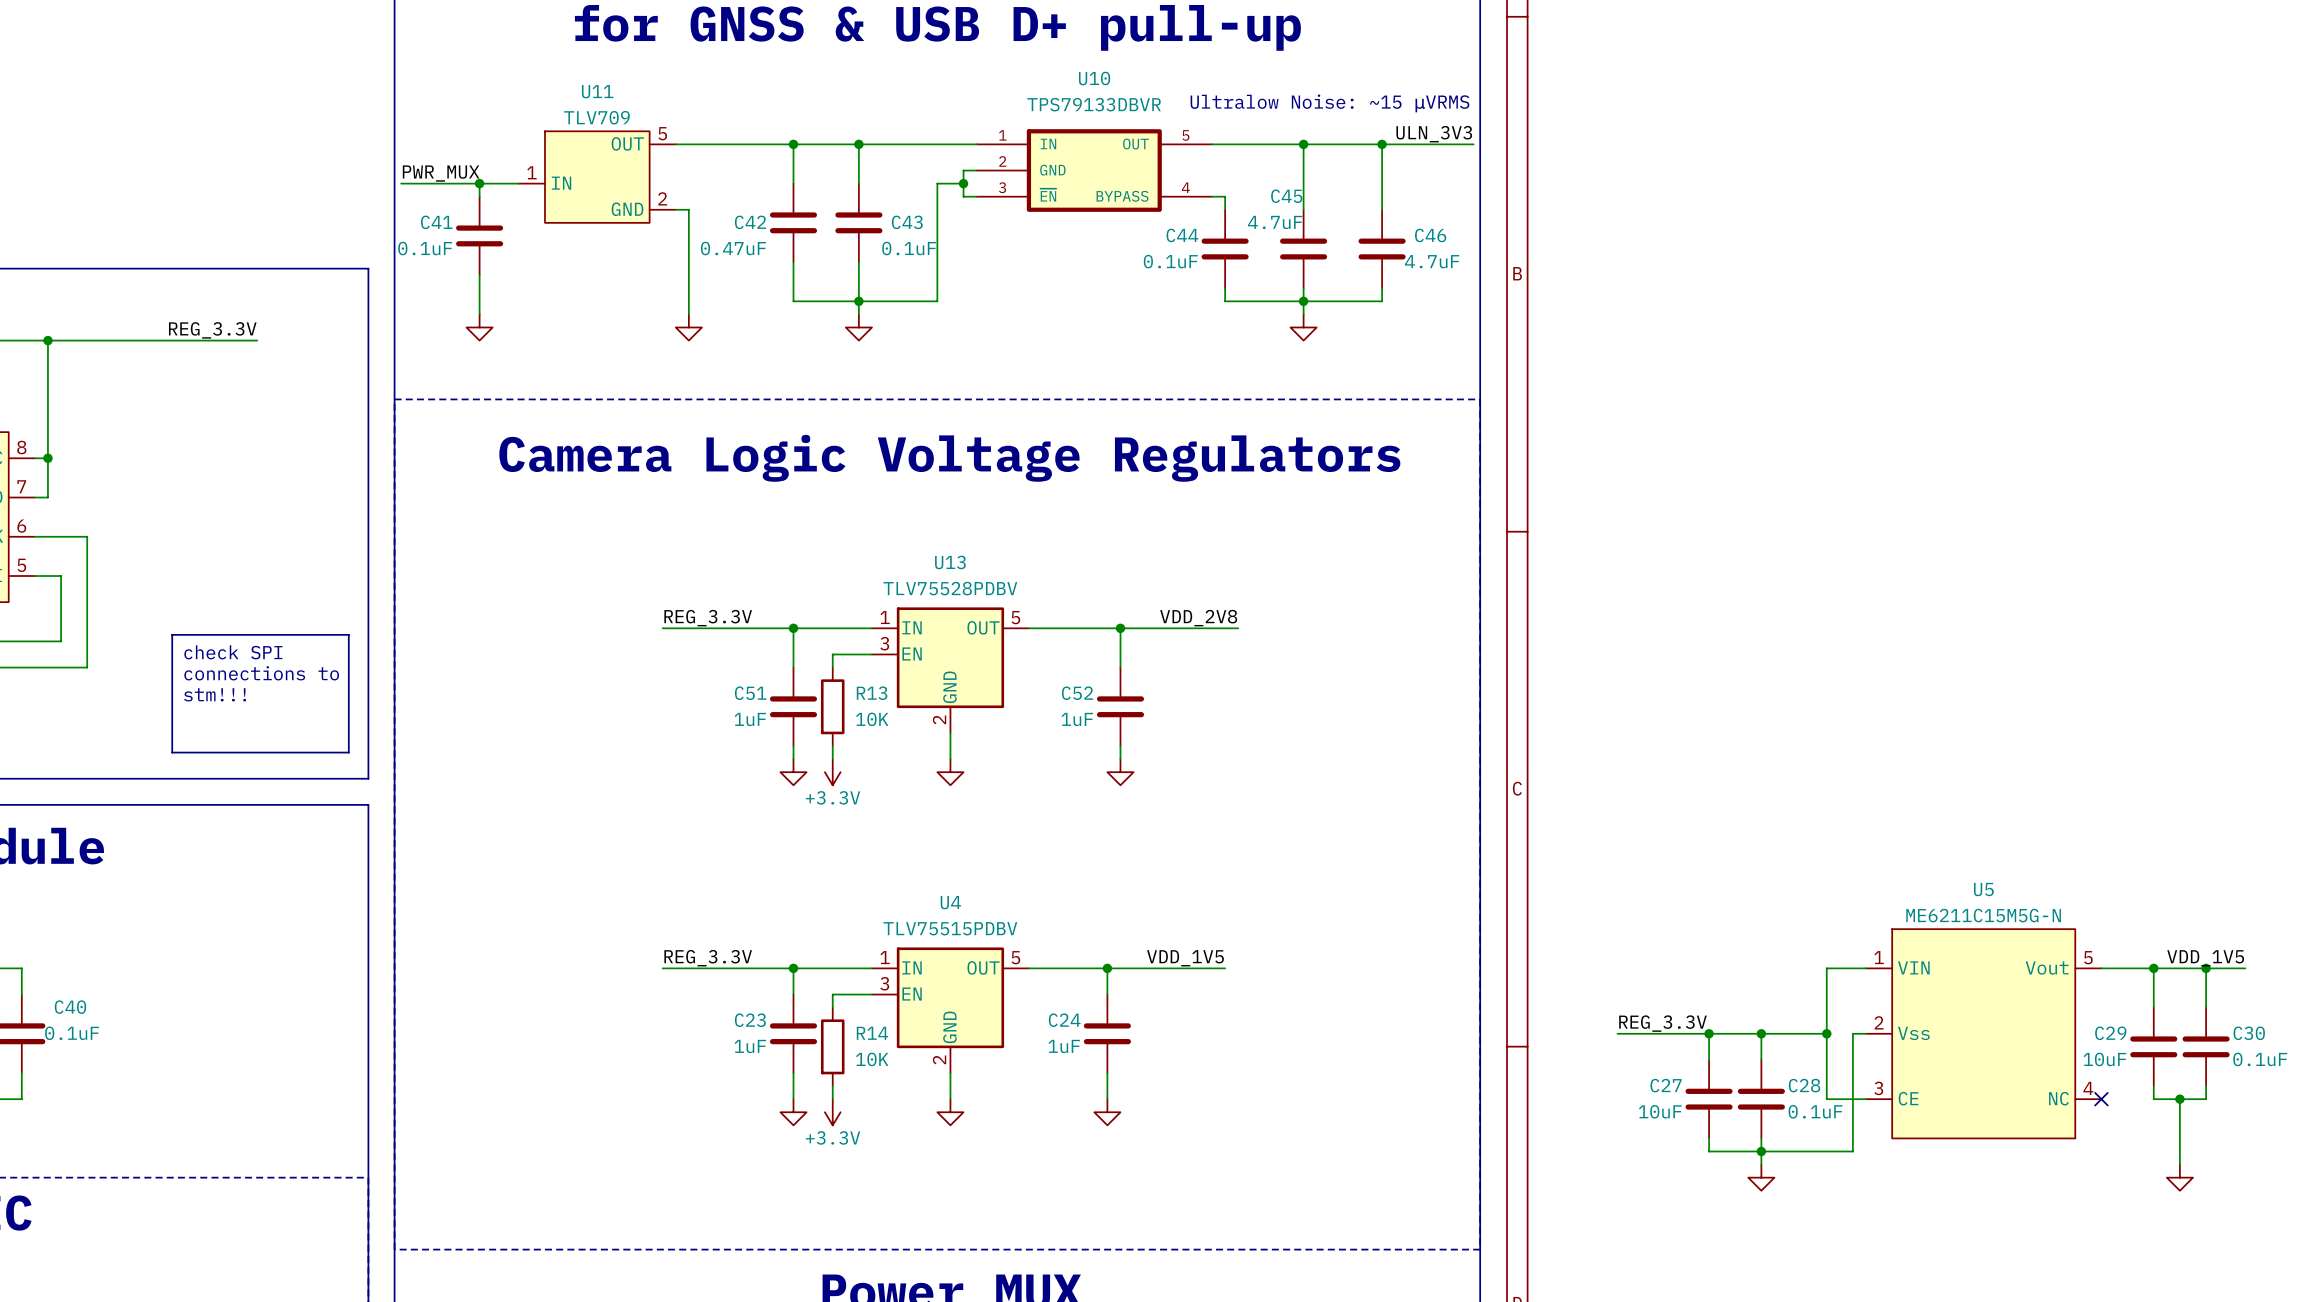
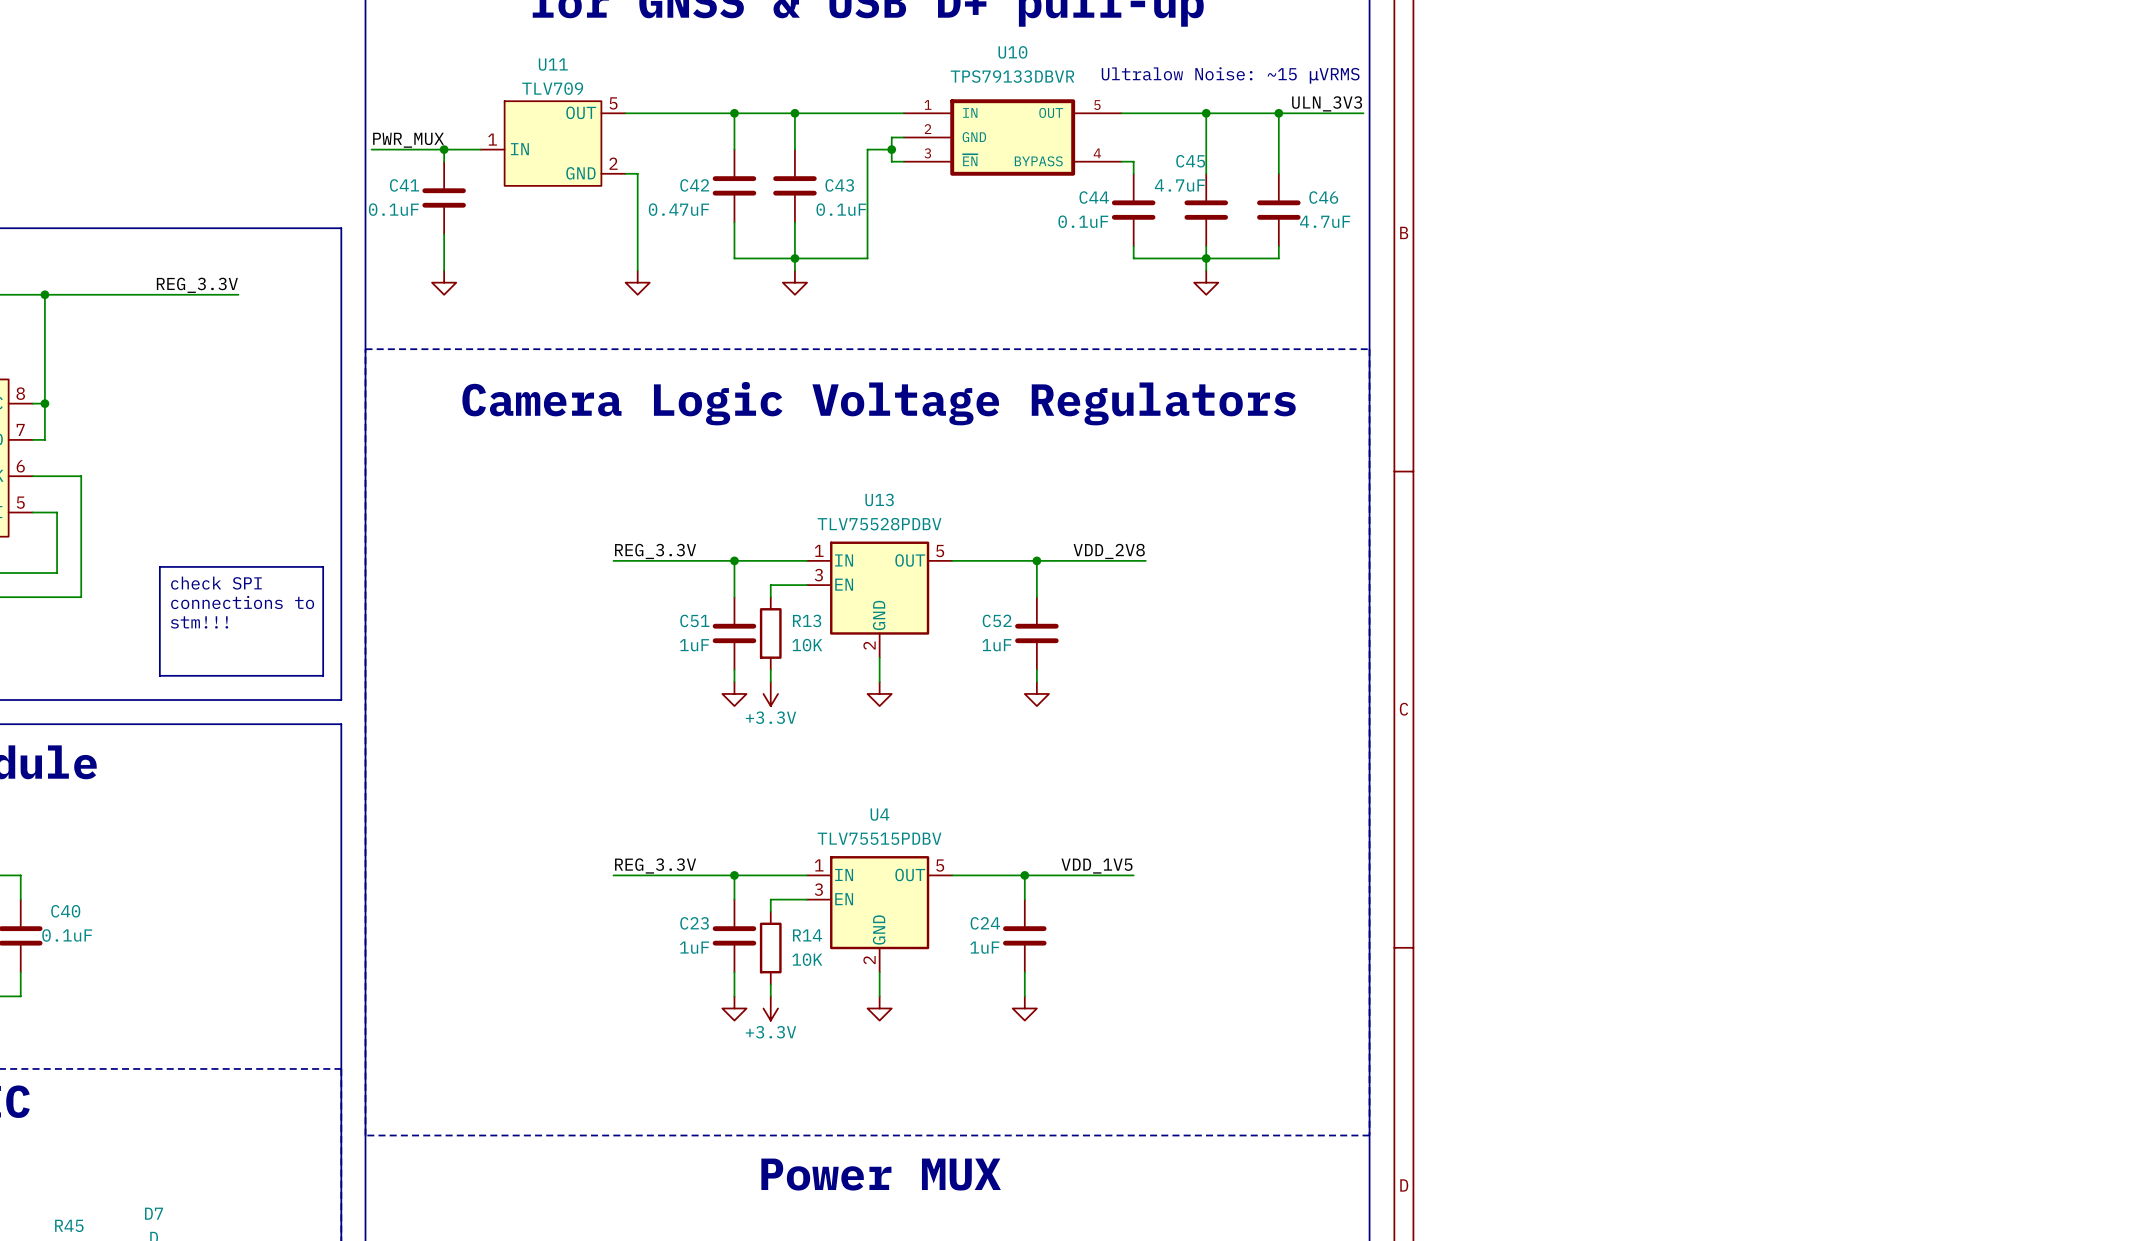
label: VDD_1V5 (2205, 958) -> none
wire: (1866, 968) (1826, 968) (1826, 1099) (1866, 1099) -> none
wire: (2101, 968) (2245, 968) -> none
wire: (2153, 968) (2153, 1007) -> none
junction: (2153, 968) -> none
wire: (2206, 968) (2206, 1007) -> none
junction: (2206, 968) -> none
label: REG_3.3V (1662, 1023) -> none
wire: (1617, 1033) (1826, 1033) -> none
wire: (1709, 1033) (1709, 1059) -> none
junction: (1709, 1033) -> none
wire: (1761, 1033) (1761, 1059) -> none
junction: (1761, 1033) -> none
junction: (1826, 1033) -> none
wire: (1866, 1033) (1852, 1033) (1852, 1151) (1709, 1151) (1709, 1138) -> none
U5: ME6211C15M5G-N (1983, 1033) -> none
C29: 10uF (2153, 1046) -> none
C30: 0.1uF (2206, 1046) -> none
wire: (2153, 1086) (2153, 1099) (2206, 1099) (2206, 1086) -> none
C27: 10uF (1709, 1099) -> none
C28: 0.1uF (1761, 1099) -> none
no-connect mark: (2101, 1099) -> none
wire: (2179, 1099) (2179, 1164) -> none
junction: (2179, 1099) -> none
wire: (1761, 1138) (1761, 1164) -> none
junction: (1761, 1151) -> none
power symbol: (1761, 1177) -> none
power symbol: (2179, 1177) -> none

